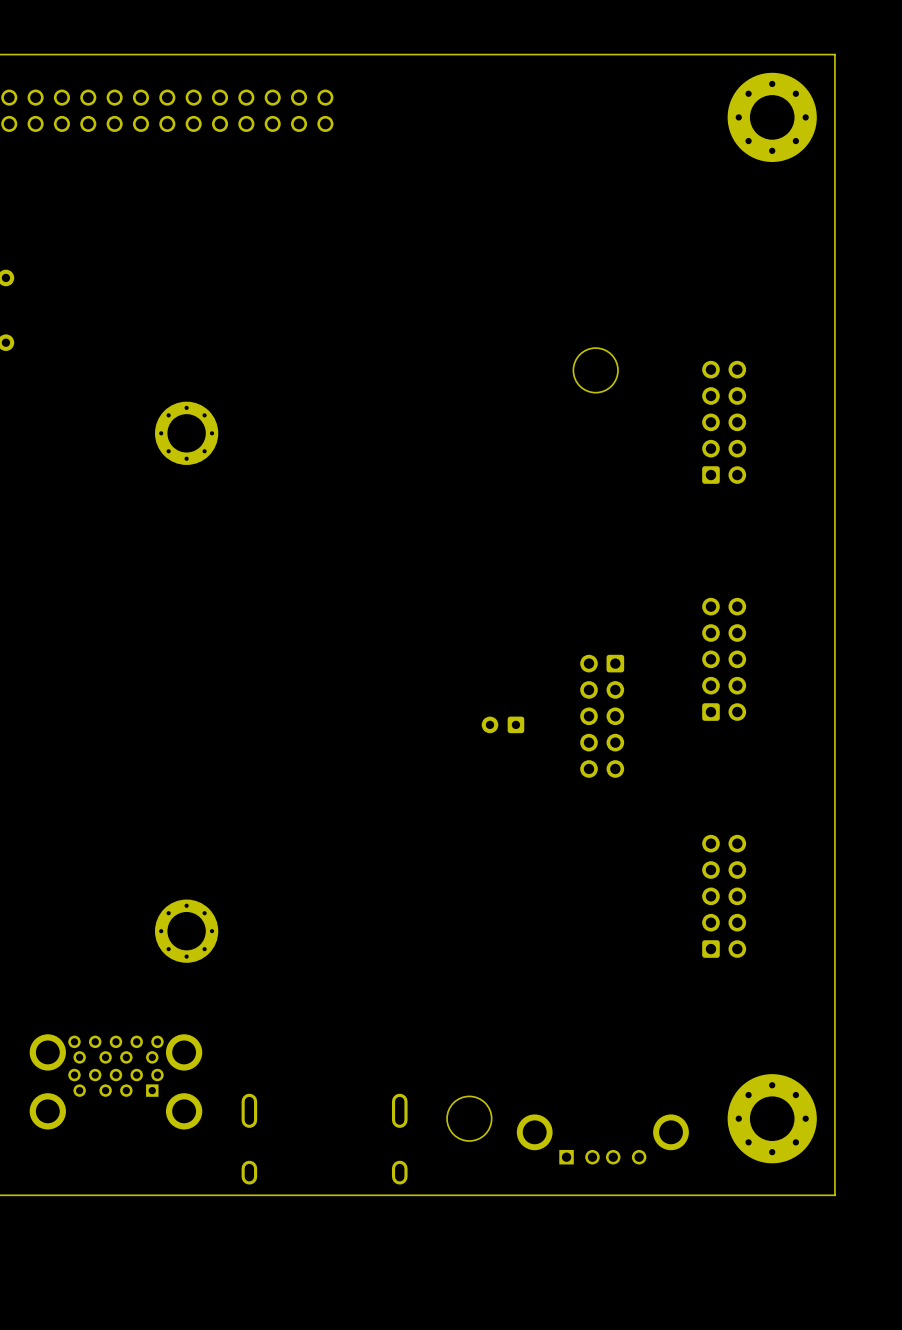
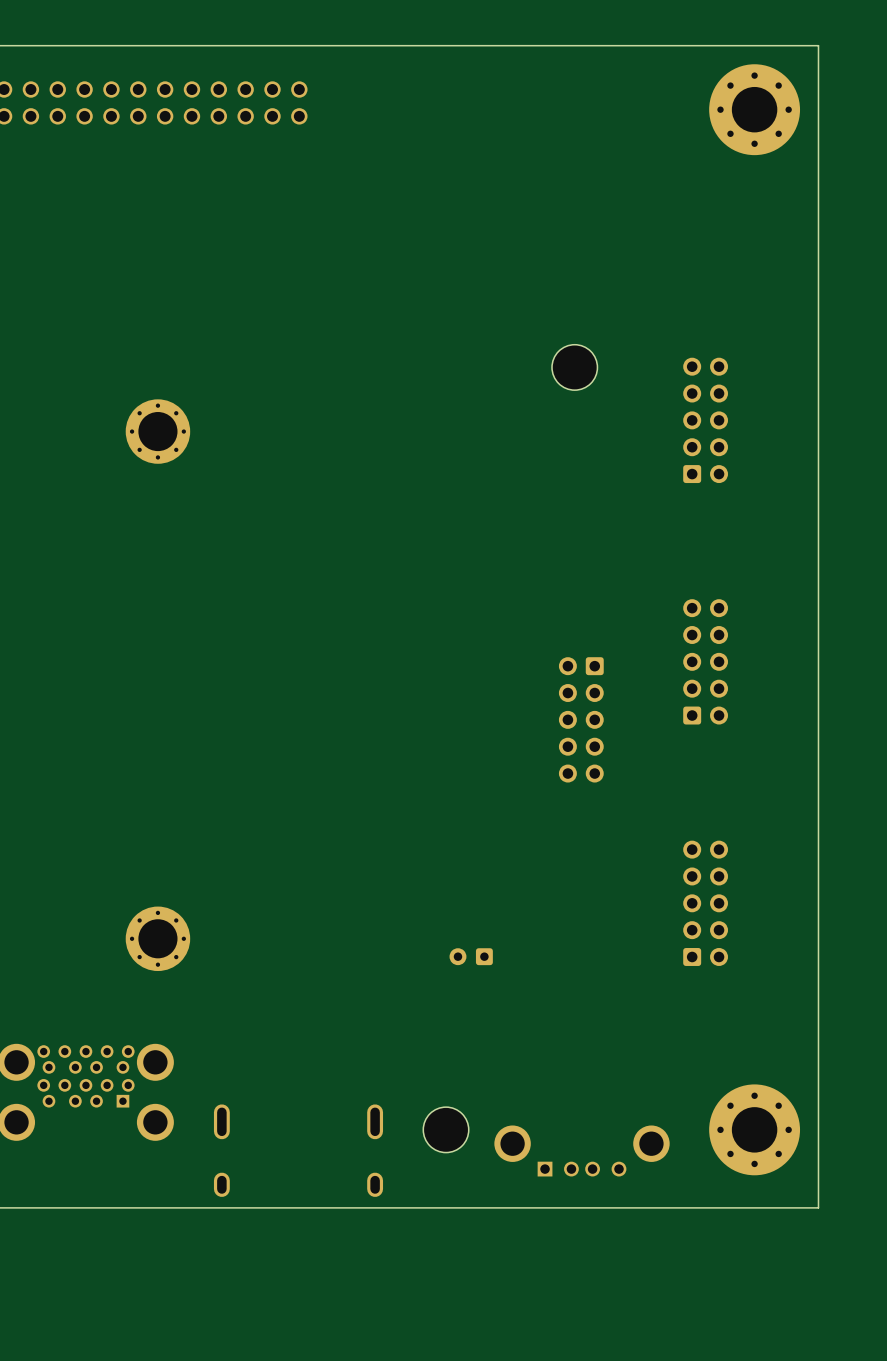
part position: (502, 724) -> (471, 956)

